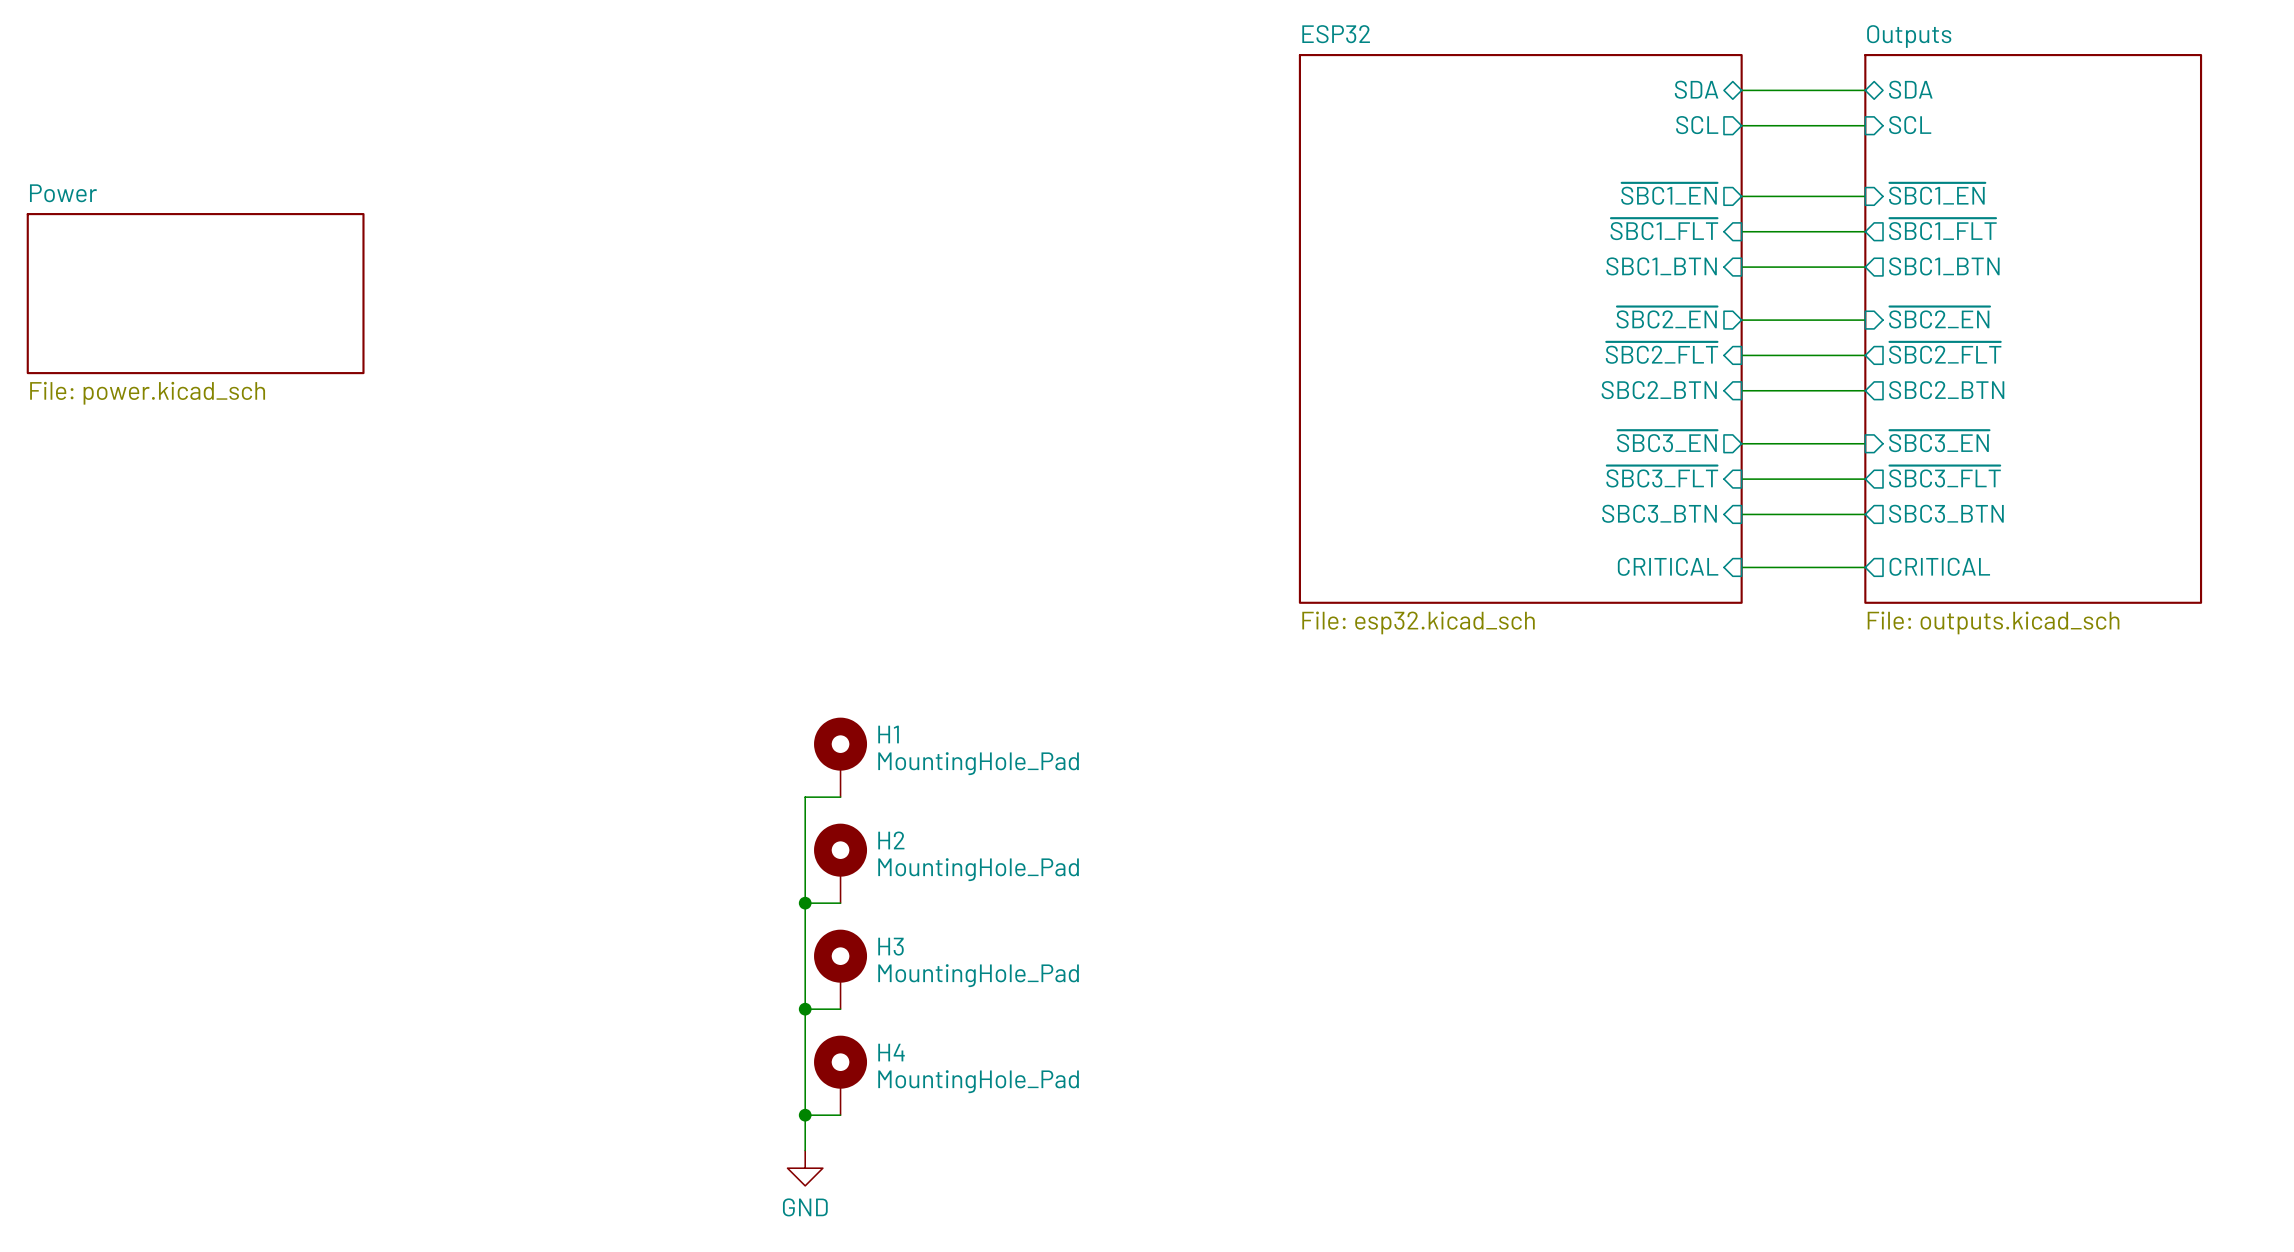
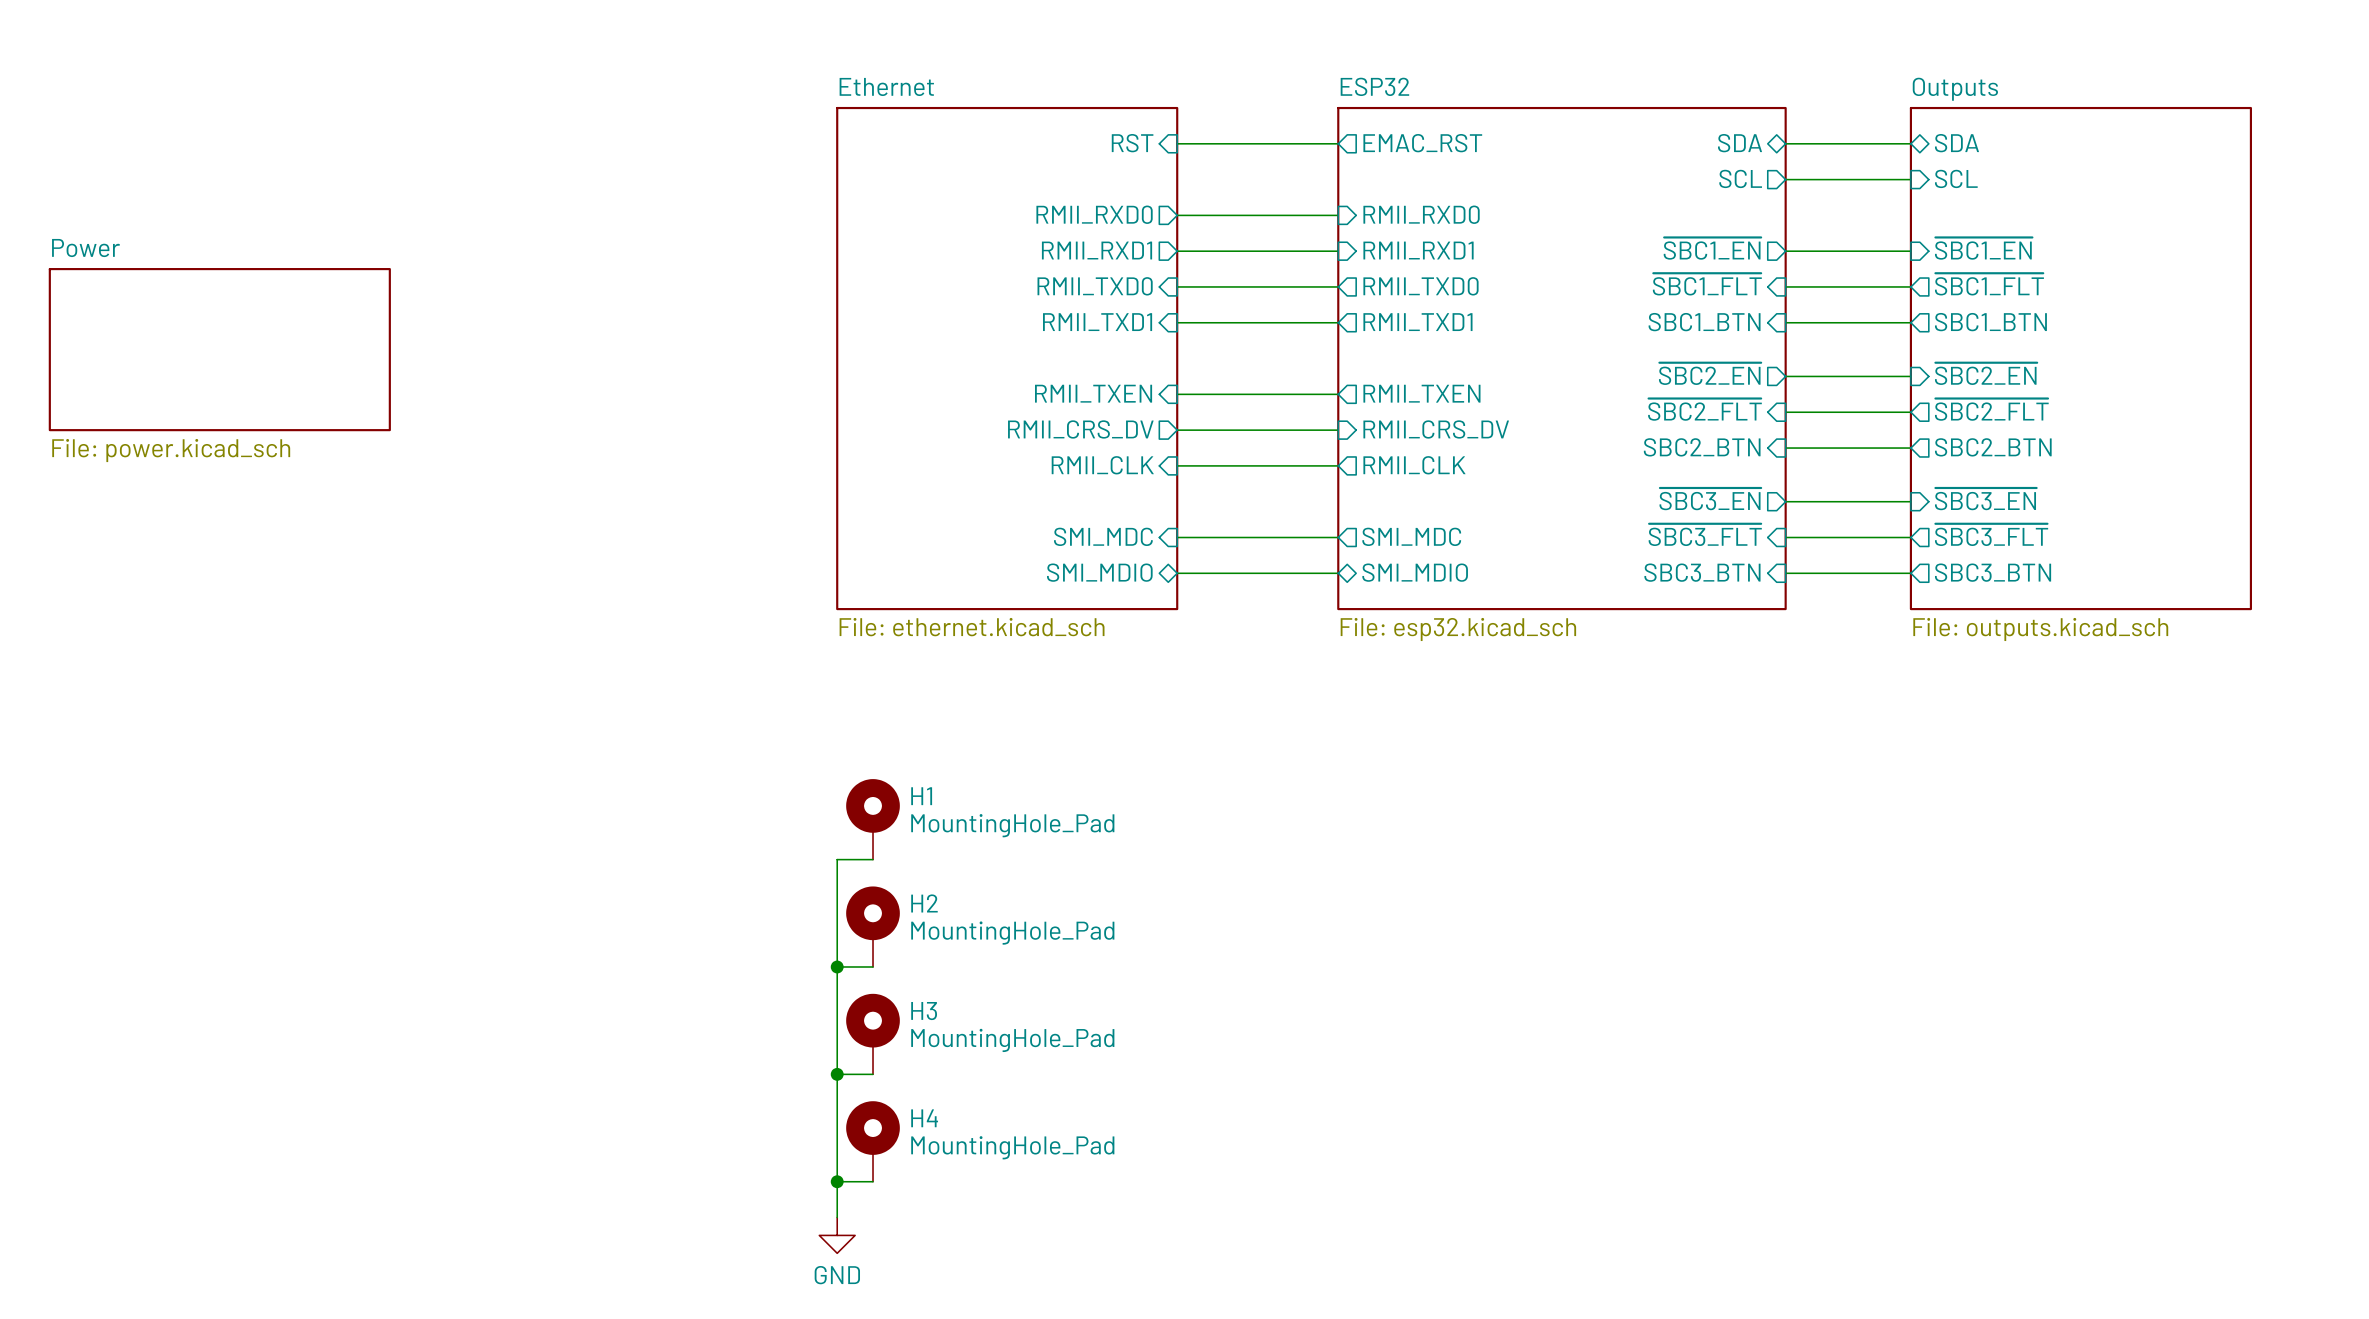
sheet ESP32 shape: [1298, 54, 1743, 604] -> [1337, 106, 1787, 611]
sheet pin: none -> RST (1132, 143)
sheet pin: none -> EMAC_RST (1422, 143)
wire: none -> (1177, 143) (1338, 143)
sheet pin: none -> RMII_RXD0 (1094, 214)
sheet pin: none -> RMII_RXD0 (1421, 214)
wire: none -> (1177, 215) (1338, 215)
sheet pin: none -> RMII_RXD1 (1097, 250)
sheet pin: none -> RMII_RXD1 (1418, 250)
wire: none -> (1177, 251) (1338, 251)
sheet pin: none -> RMII_TXD0 (1095, 286)
wire: none -> (1177, 286) (1338, 286)
sheet pin: none -> RMII_TXD0 (1420, 286)
sheet pin: none -> RMII_TXD1 (1097, 322)
sheet pin: none -> RMII_TXD1 (1417, 322)
wire: none -> (1177, 322) (1338, 322)
sheet Ethernet: none -> File: ethernet.kicad_sch (1007, 358)
sheet Outputs: none -> File: outputs.kicad_sch (2080, 358)
sheet Outputs: File: outputs.kicad_sch (2033, 328) -> none
sheet pin: none -> RMII_TXEN (1093, 393)
wire: none -> (1177, 394) (1338, 394)
sheet pin: none -> RMII_TXEN (1421, 393)
sheet pin: none -> RMII_CRS_DV (1080, 429)
sheet pin: none -> RMII_CRS_DV (1436, 429)
wire: none -> (1177, 430) (1338, 430)
sheet pin: none -> RMII_CLK (1102, 465)
sheet pin: none -> RMII_CLK (1414, 465)
wire: none -> (1177, 465) (1338, 465)
sheet pin: none -> SMI_MDC (1103, 536)
sheet pin: none -> SMI_MDC (1411, 536)
wire: none -> (1177, 537) (1338, 537)
sheet pin: none -> SMI_MDIO (1099, 572)
sheet pin: none -> SMI_MDIO (1415, 572)
wire: none -> (1177, 573) (1338, 573)
sheet pin: CRITICAL (1668, 566) -> none
sheet pin: CRITICAL (1939, 566) -> none
wire: (1741, 567) (1865, 567) -> none

